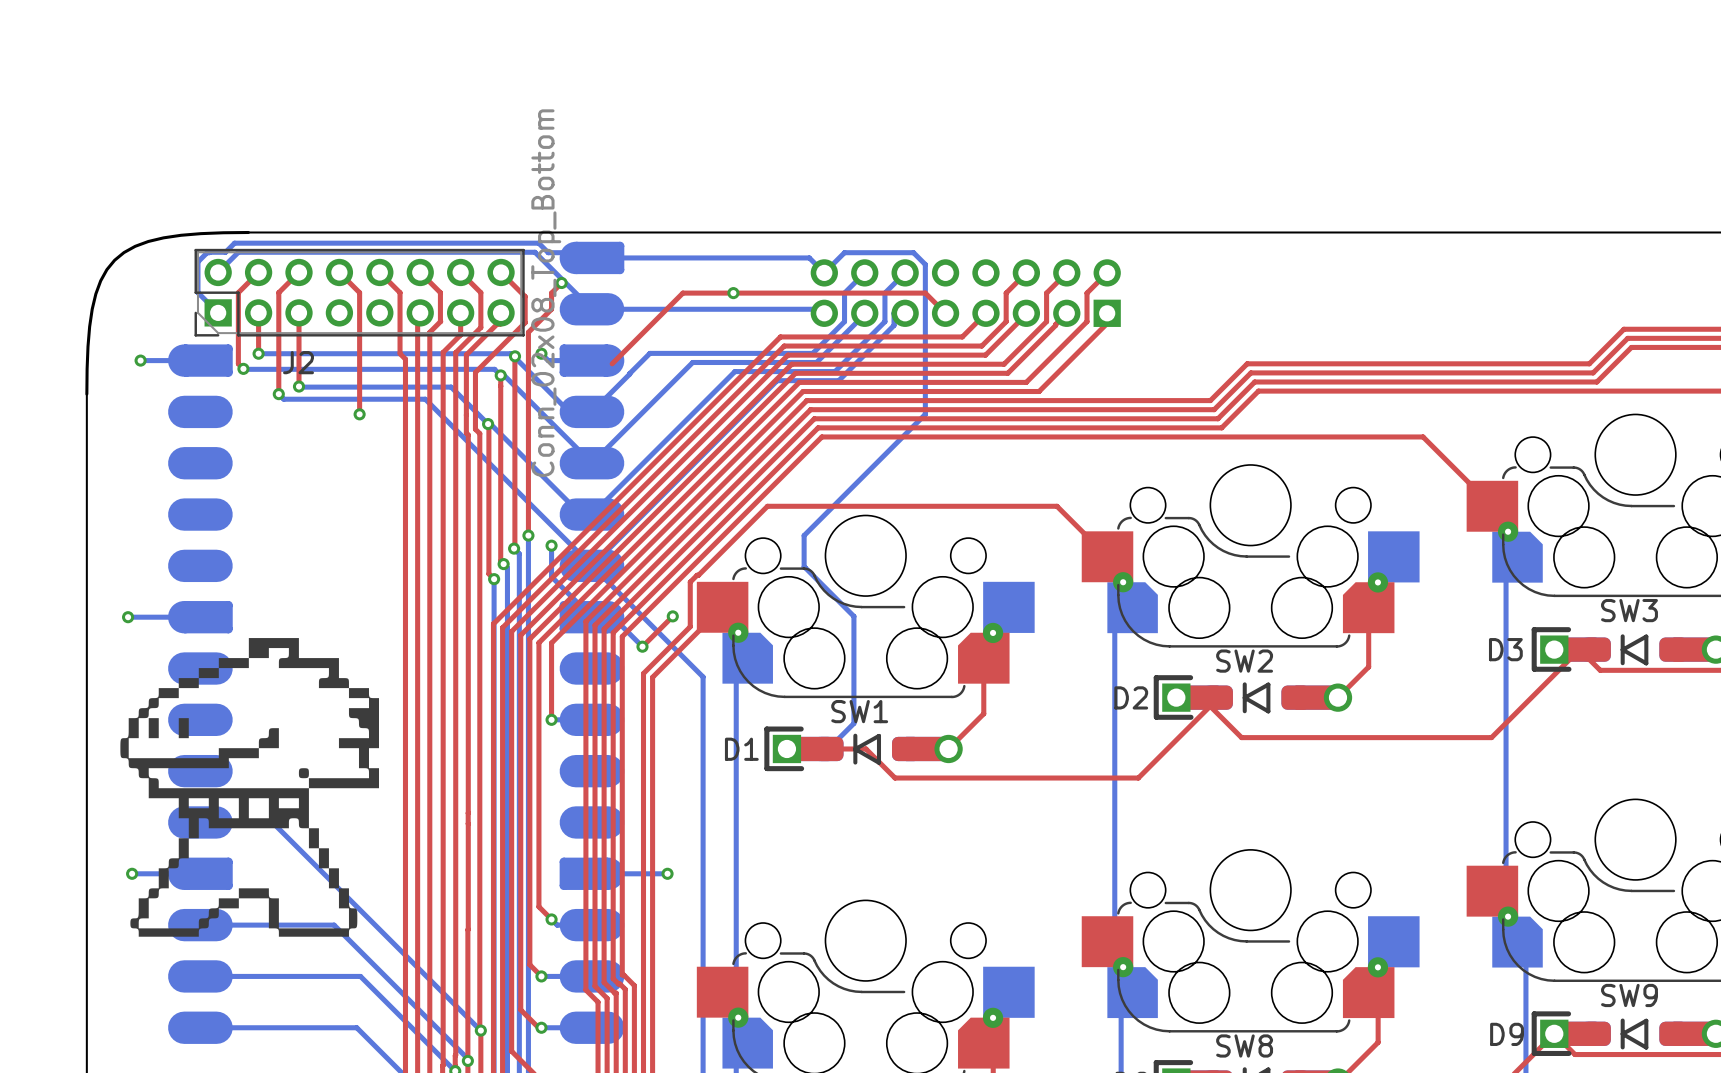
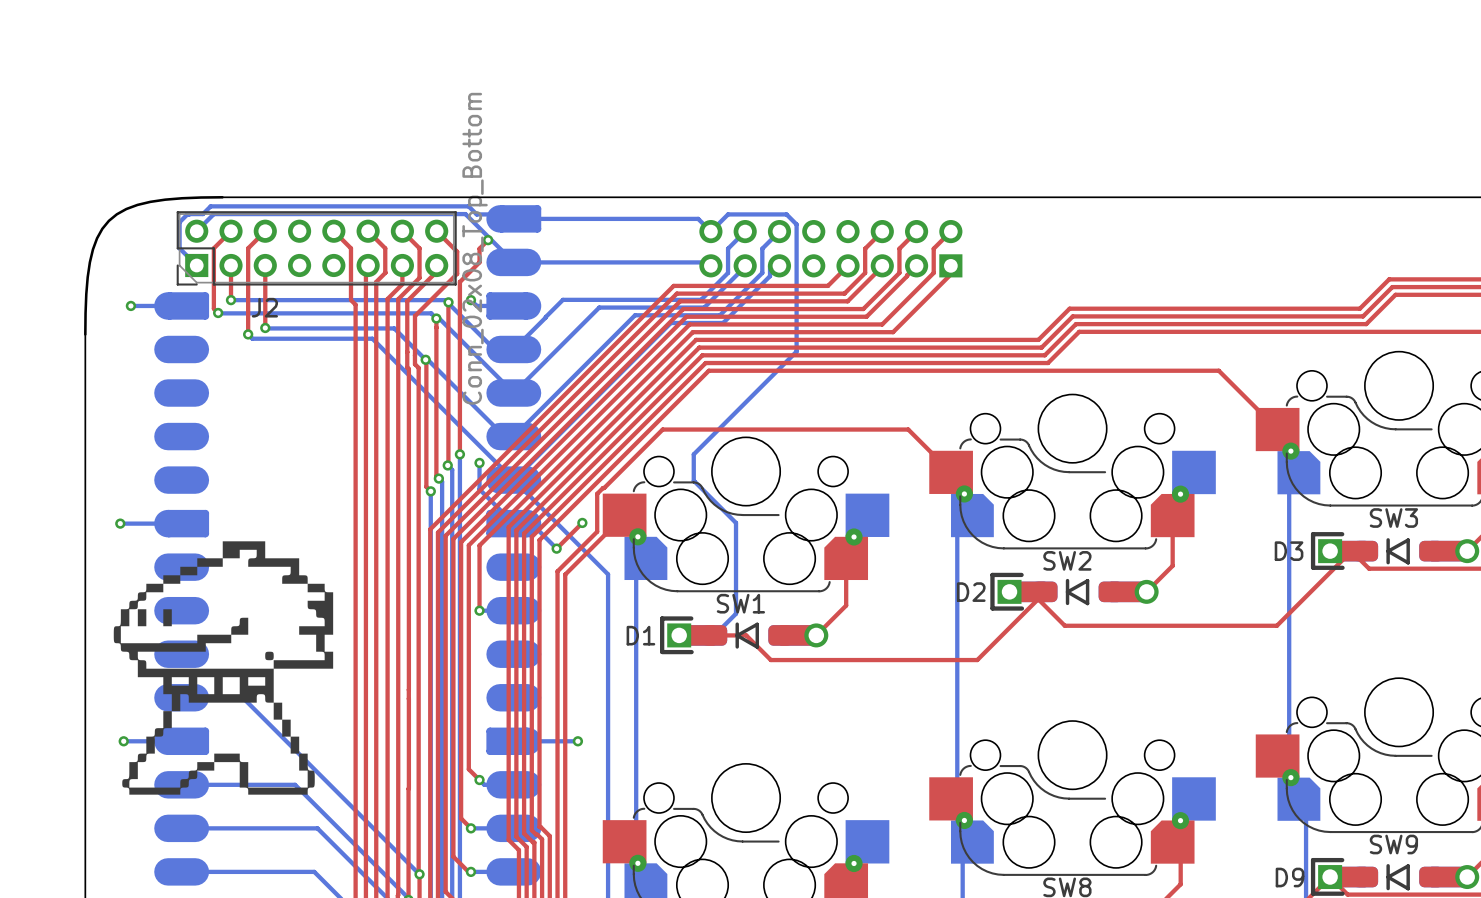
top track: (339, 272) (359, 292) (359, 414) -> none
via: (733, 293) -> none
top track: (945, 313) (925, 293) (682, 293) (612, 363) -> none
via: (359, 414) -> none

